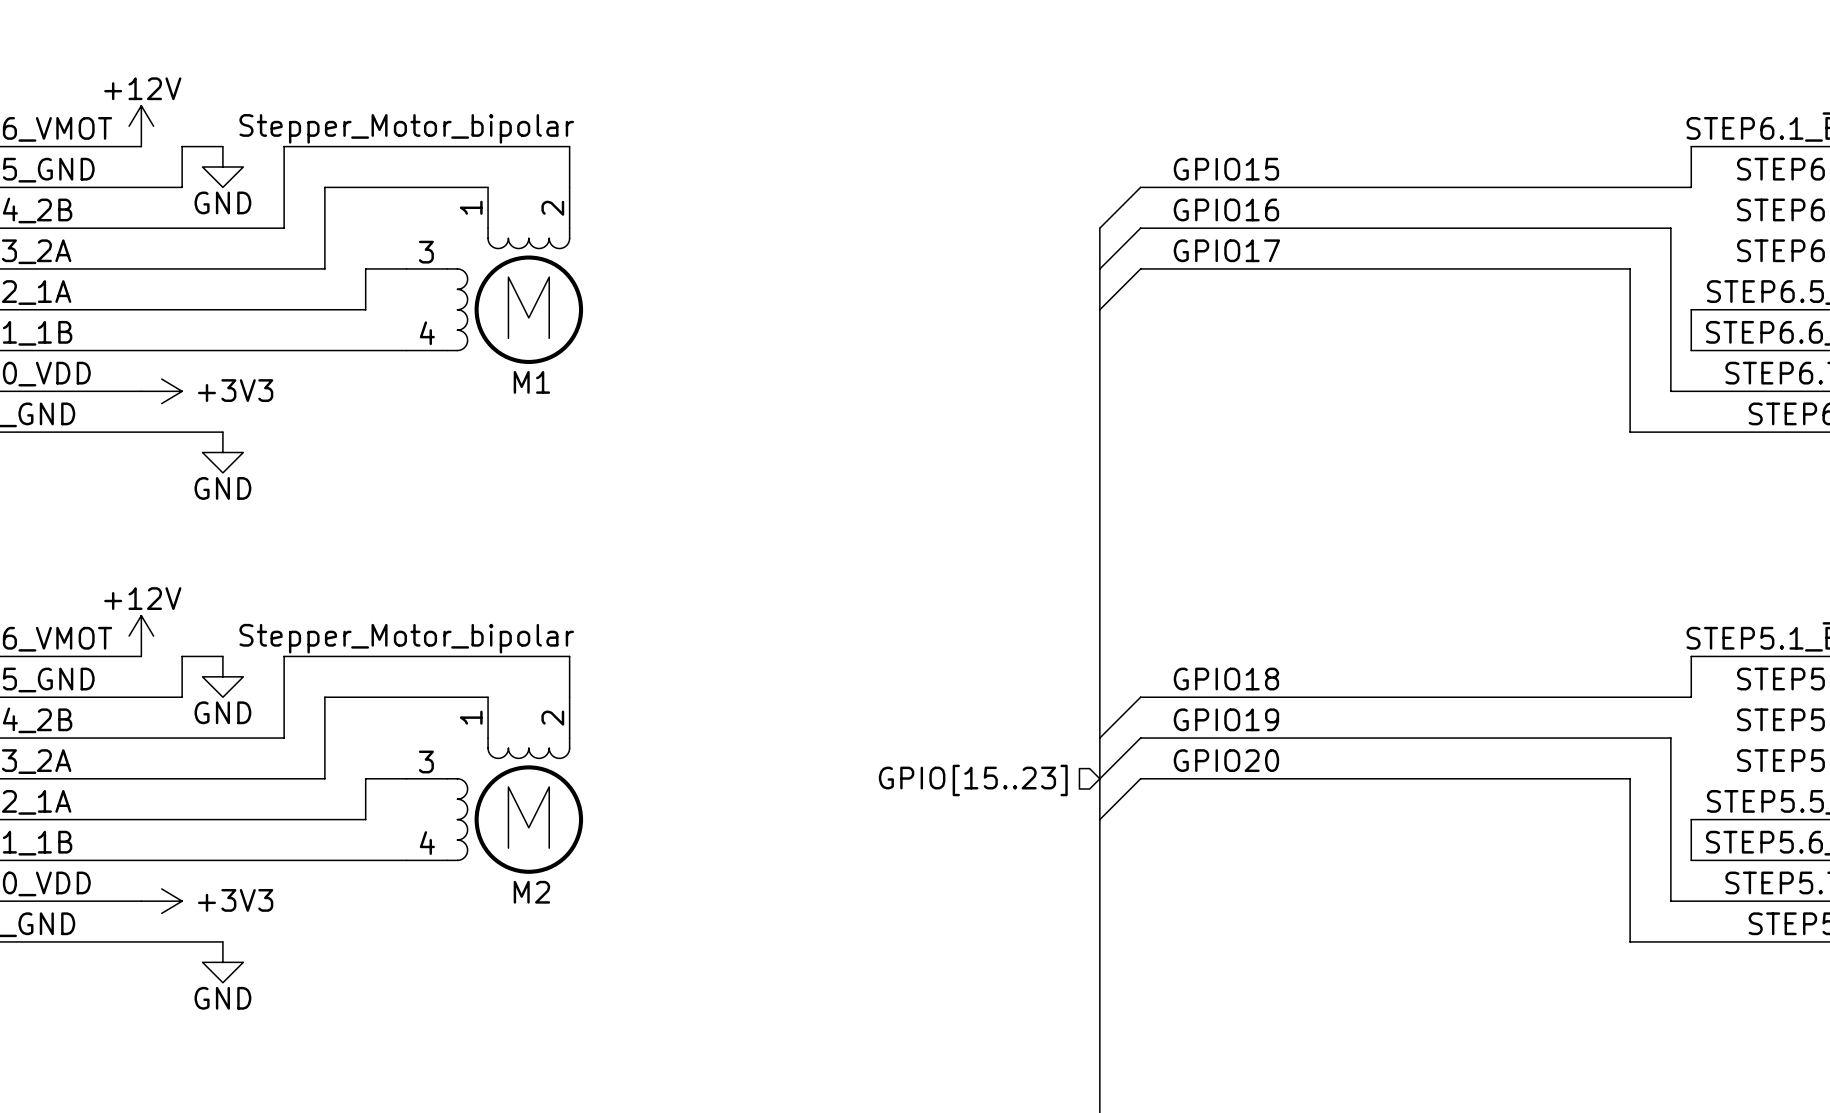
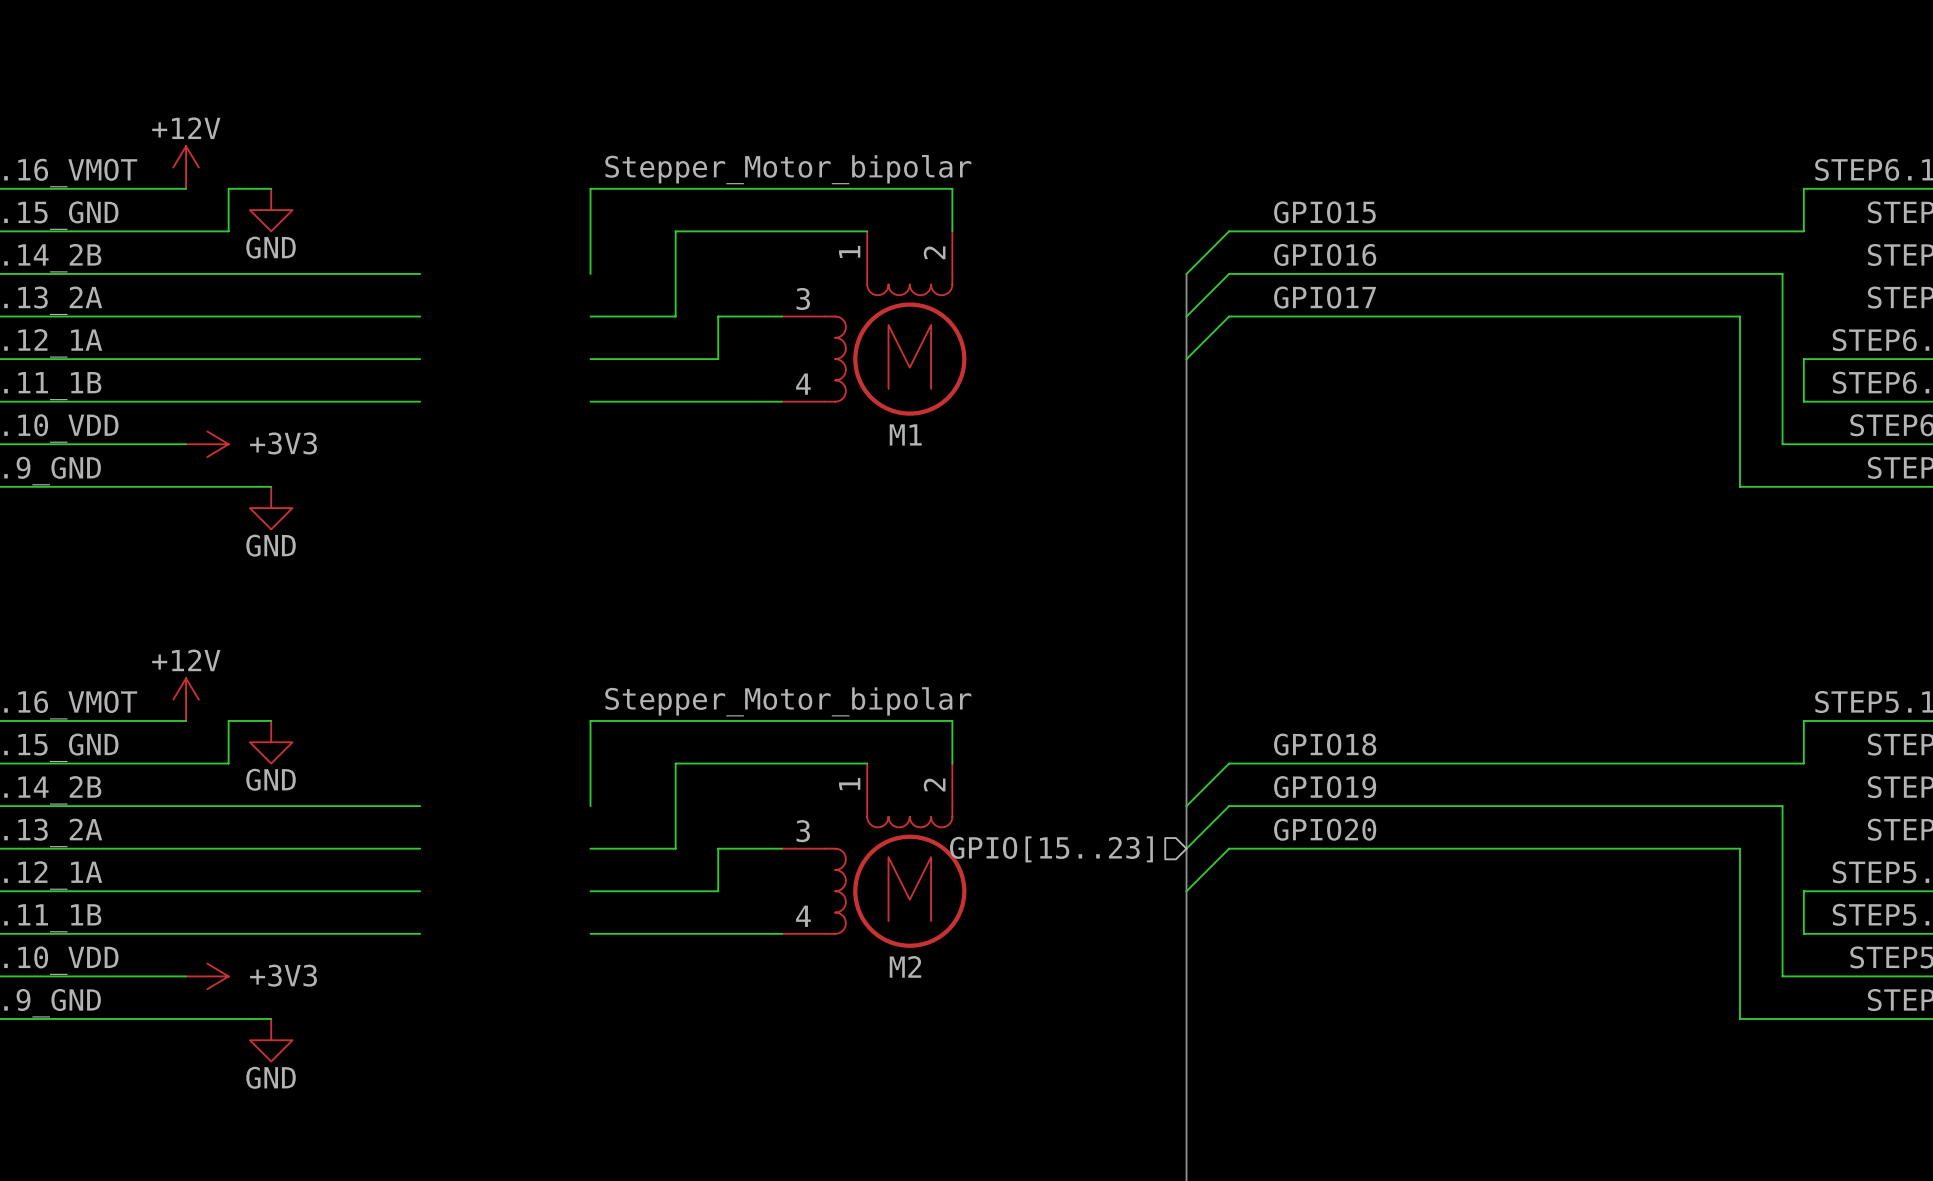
wire: (528, 146) (284, 146) (284, 228) -> (420, 273) (335, 273)
wire: none -> (590, 188) (590, 273)
wire: (569, 146) (569, 187) -> (633, 188) (952, 188) (952, 231)
wire: (488, 187) (324, 187) (324, 268) -> (420, 316) (377, 316)
wire: none -> (867, 231) (675, 231) (675, 316) (590, 316)
wire: (406, 268) (365, 268) (365, 309) -> none
wire: none -> (782, 316) (718, 316) (718, 359) (590, 359)
M1 position: (494, 275) -> (874, 323)
wire: (365, 350) (406, 350) -> none
wire: none -> (590, 401) (782, 401)
wire: (528, 656) (284, 656) (284, 738) -> (420, 806) (335, 806)
wire: none -> (590, 720) (590, 806)
wire: (569, 656) (569, 697) -> (633, 720) (952, 720) (952, 763)
wire: (488, 697) (324, 697) (324, 778) -> (420, 848) (377, 848)
wire: none -> (867, 763) (675, 763) (675, 848) (590, 848)
wire: (406, 778) (365, 778) (365, 819) -> none
wire: none -> (782, 848) (718, 848) (718, 891) (590, 891)
M2 position: (494, 785) -> (874, 855)
wire: (365, 860) (406, 860) -> none
wire: none -> (590, 933) (782, 933)

